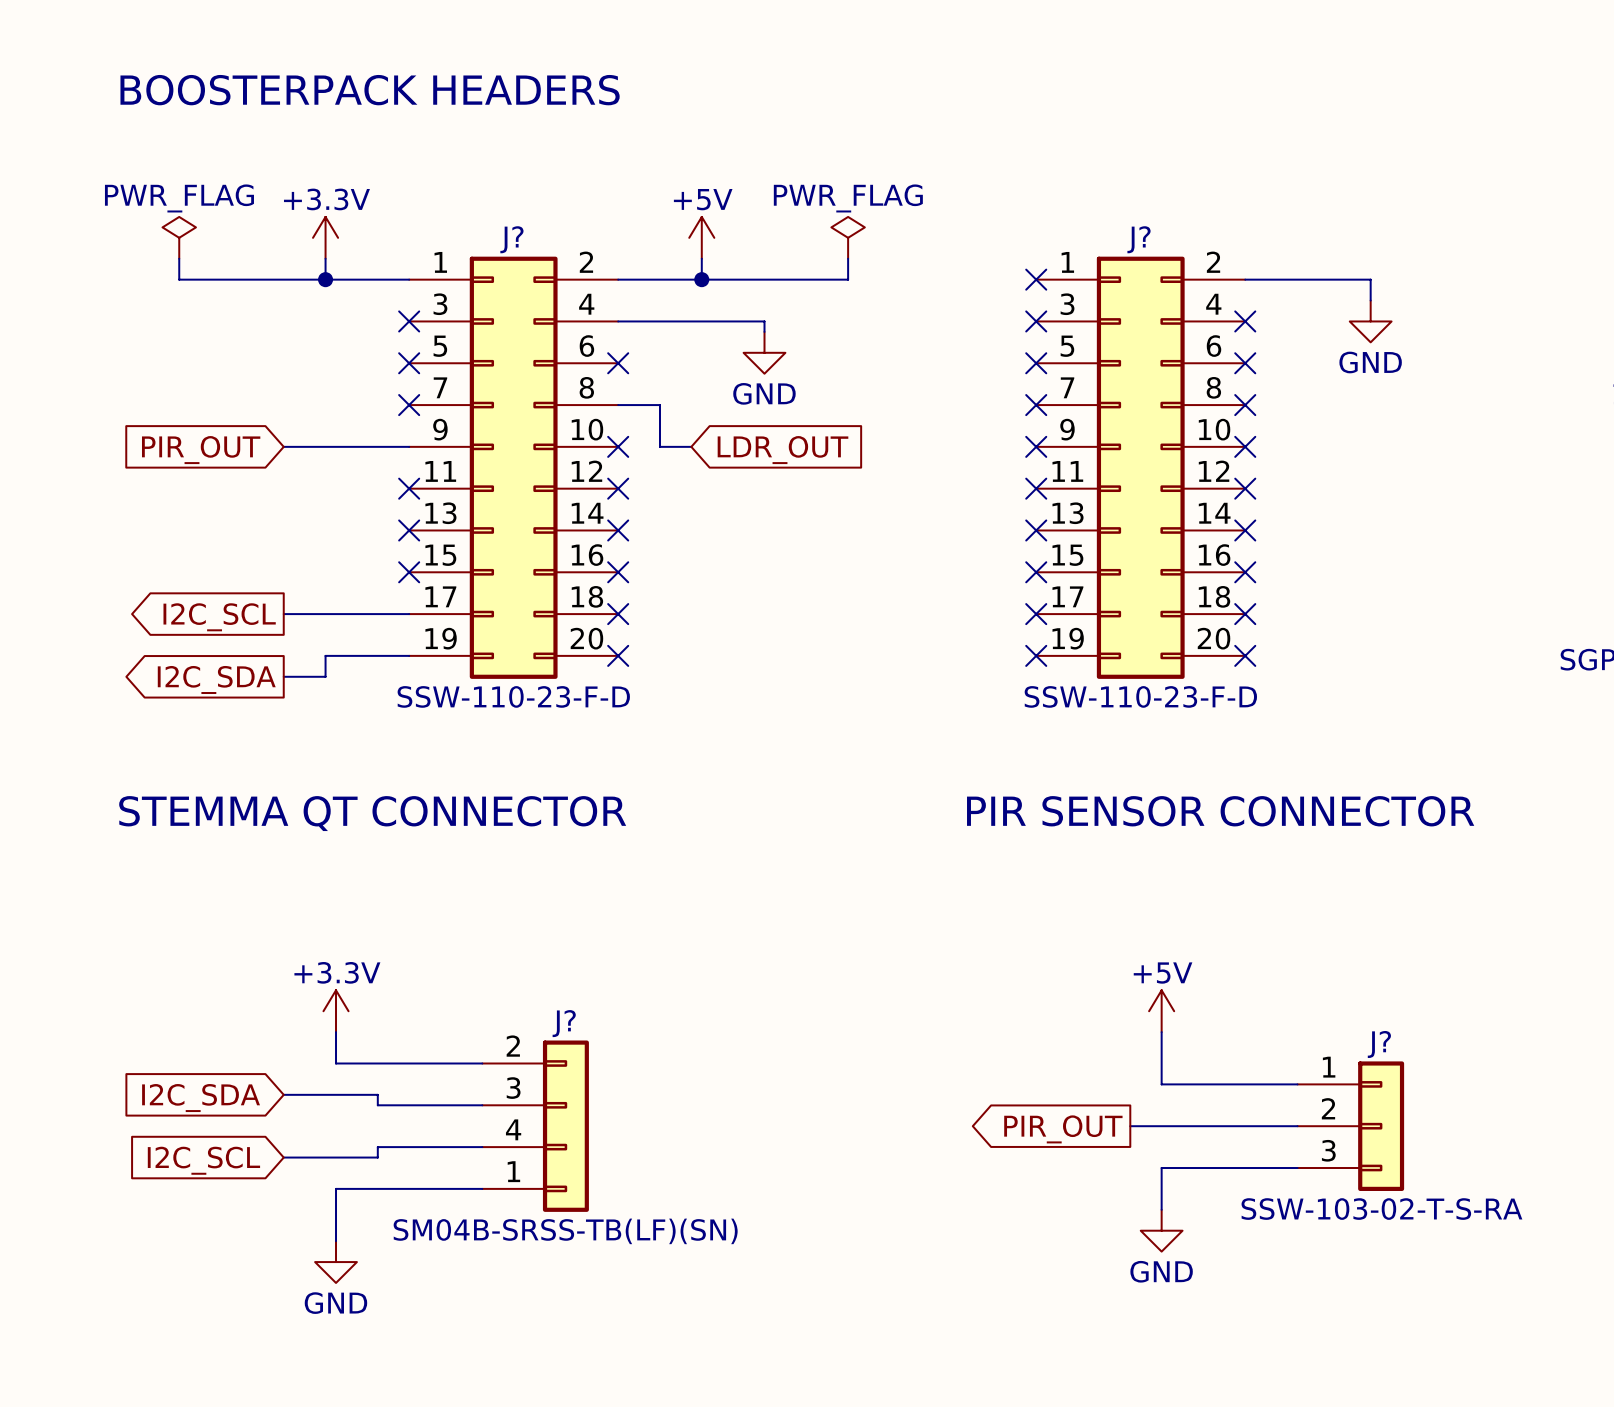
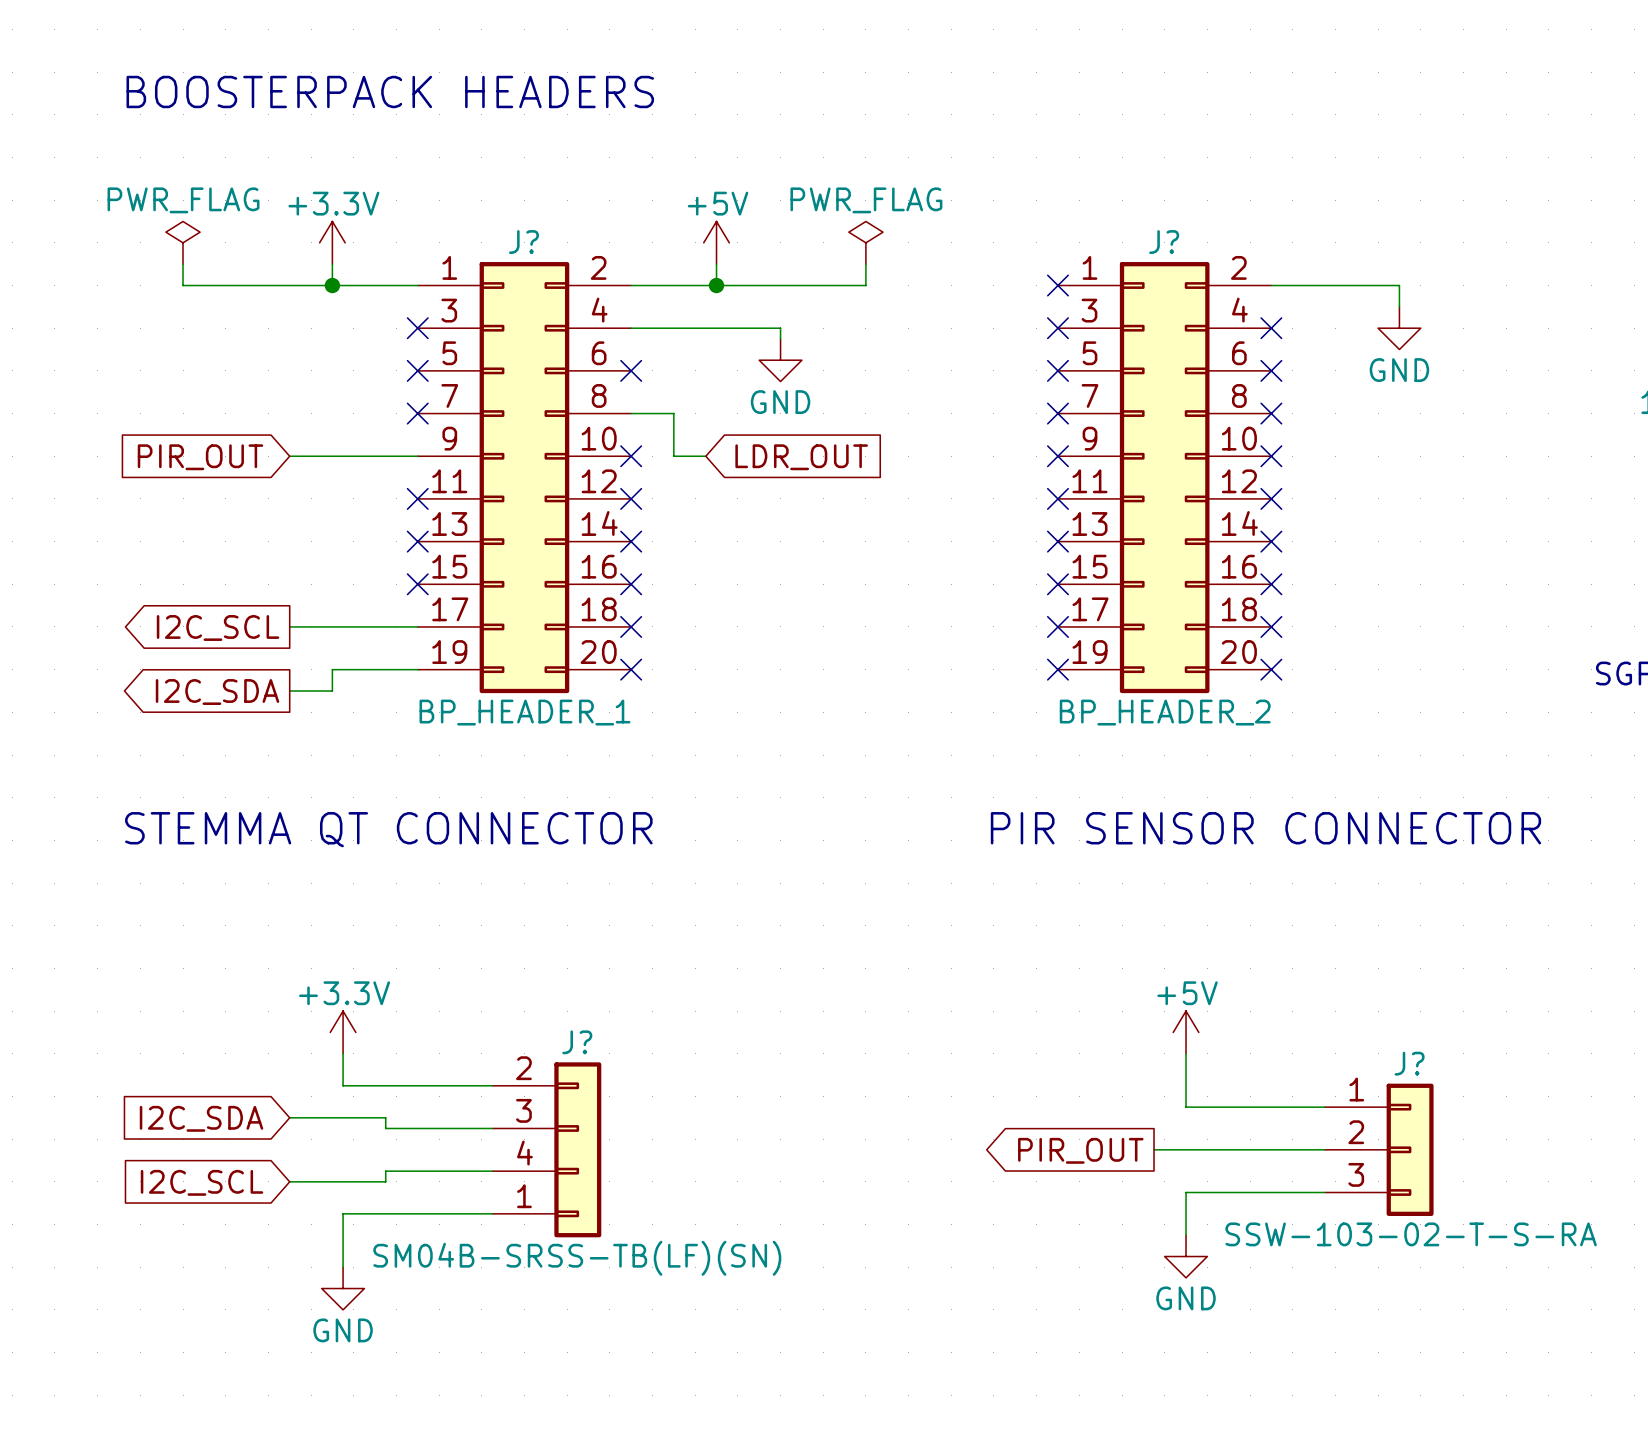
J? value: SSW-110-23-F-D (513, 696) -> BP_HEADER_1 (524, 712)
J? value: SSW-110-23-F-D (1140, 696) -> BP_HEADER_2 (1165, 712)

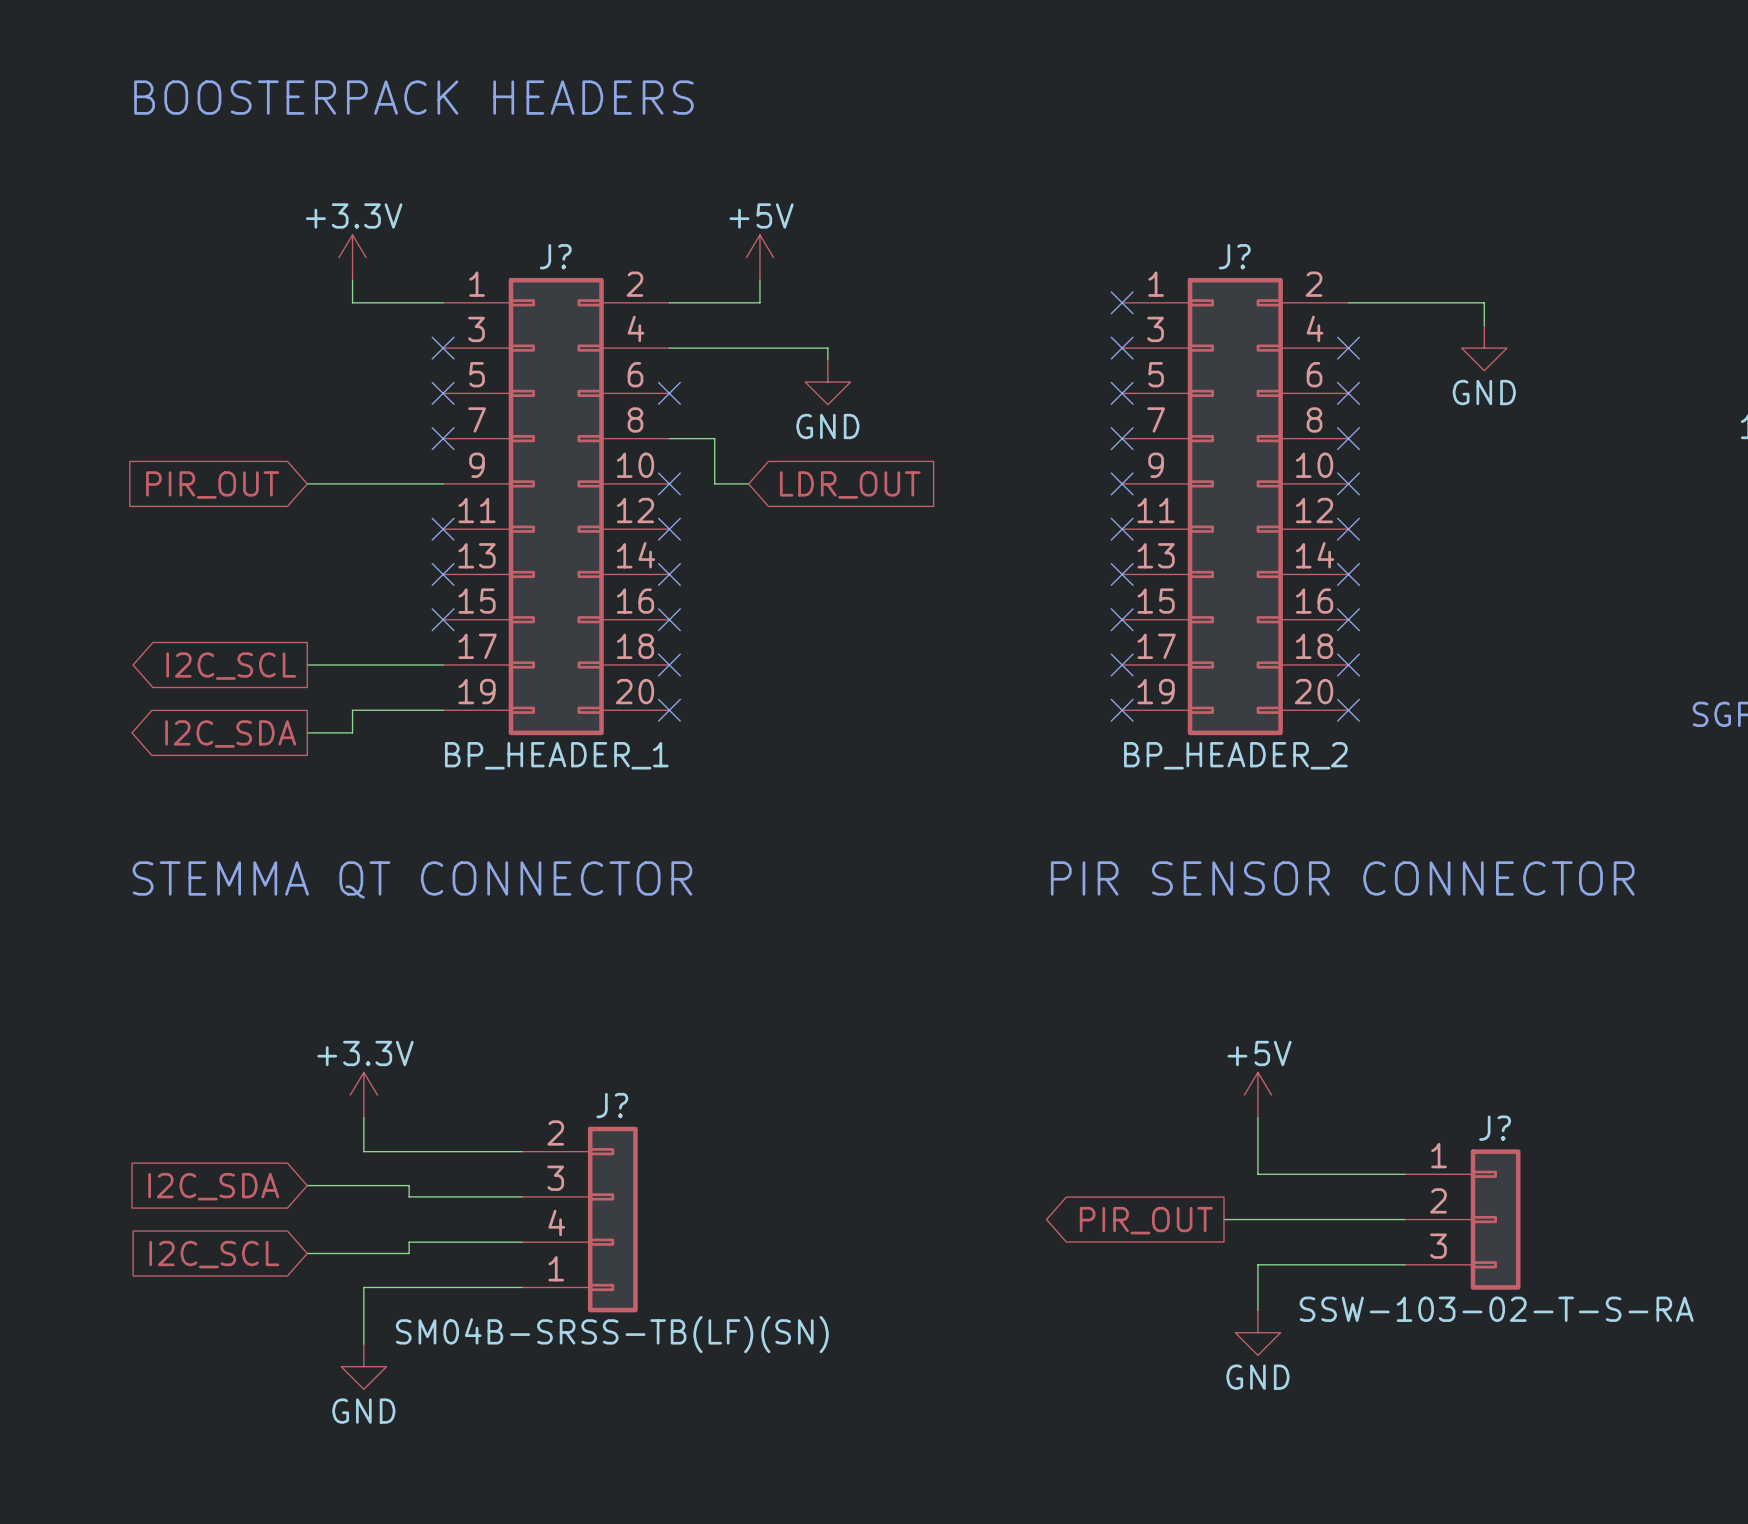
power symbol: PWR_FLAG (183, 242) -> none
power symbol: PWR_FLAG (865, 242) -> none
wire: (183, 264) (183, 285) (332, 285) -> none
wire: (865, 264) (865, 285) (716, 285) -> none
junction: (332, 285) -> none
junction: (716, 285) -> none

